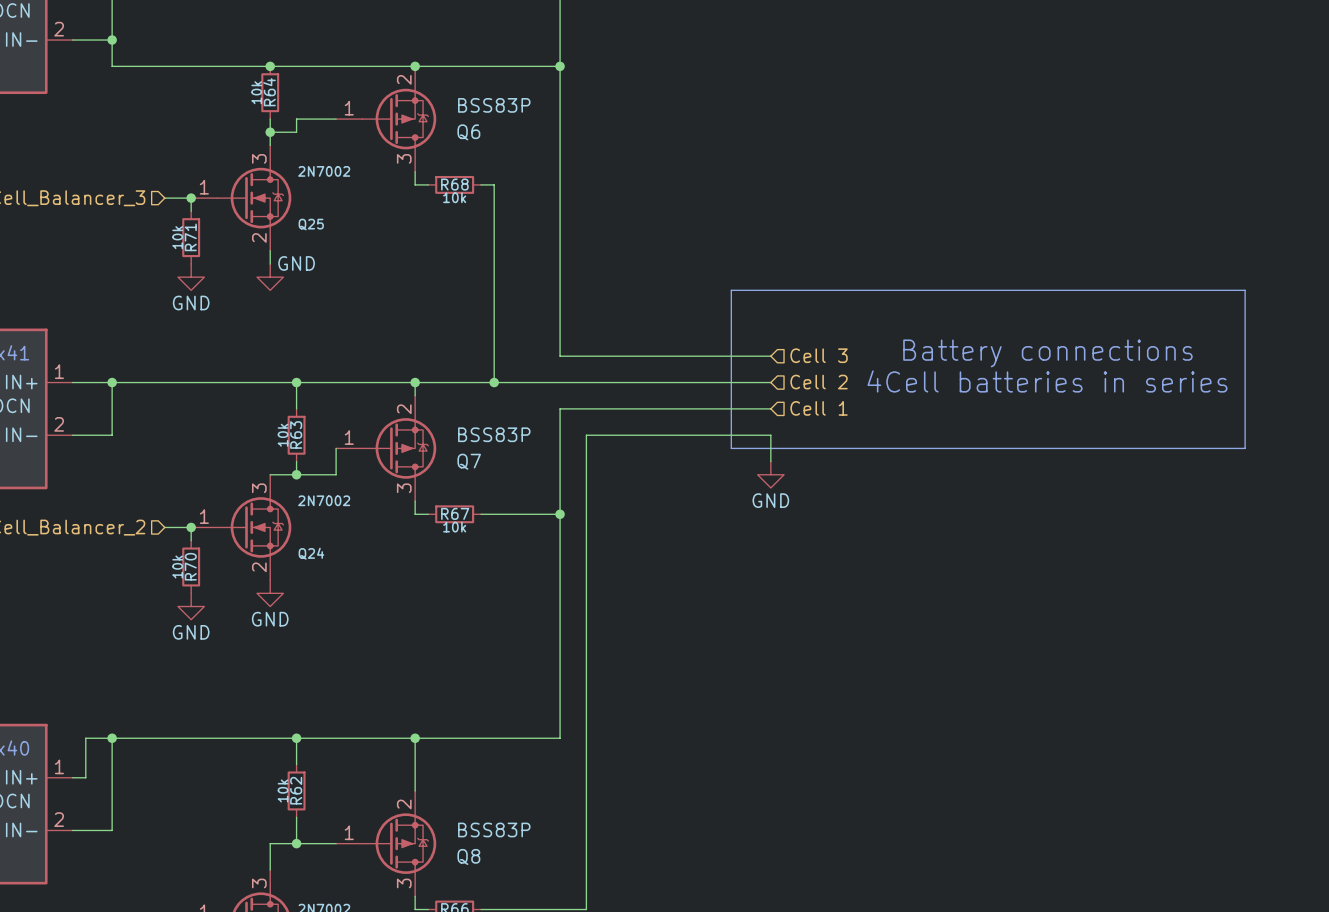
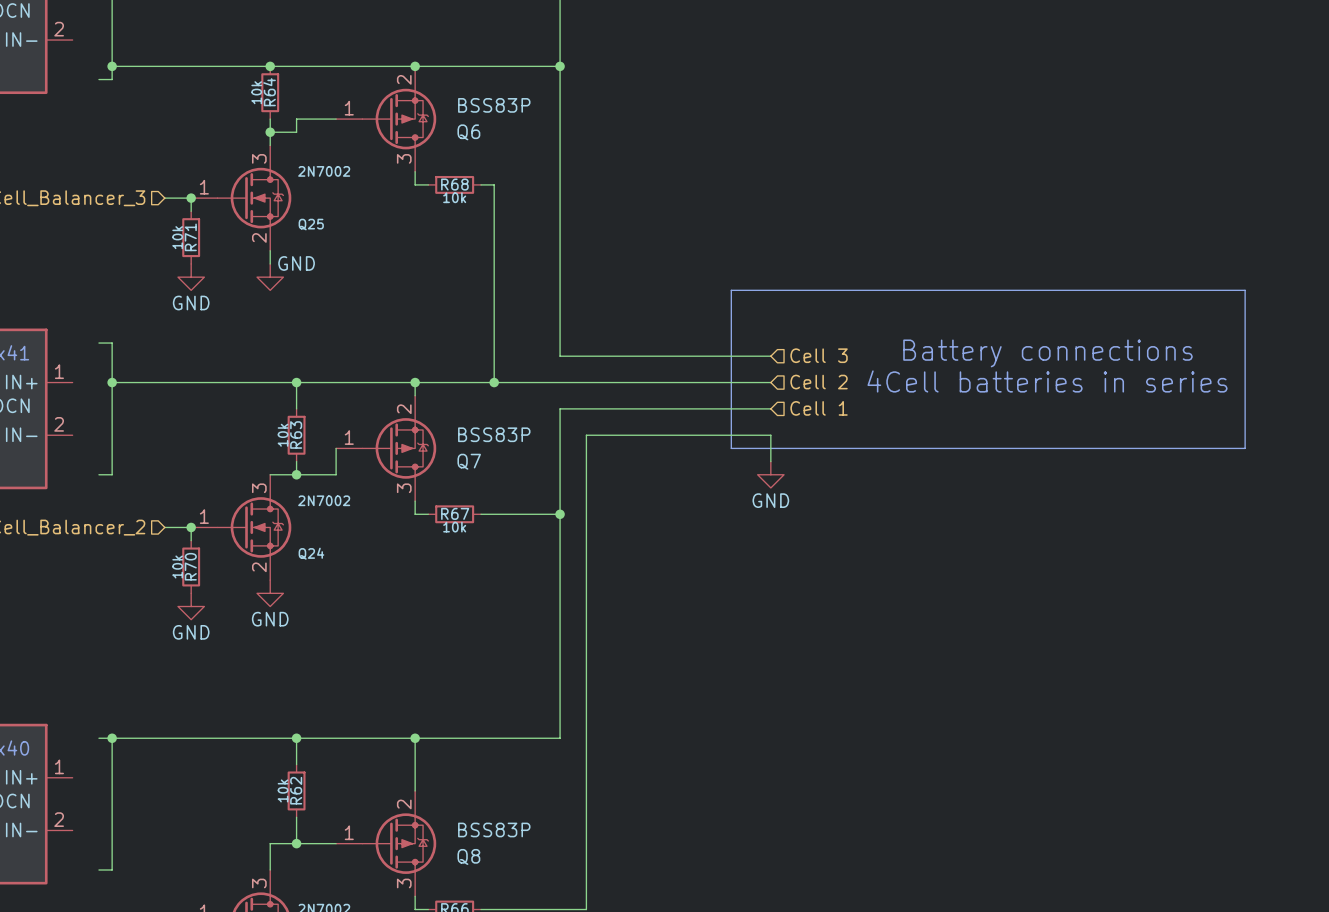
wire: (72, 40) (112, 40) -> none
junction position: (112, 40) -> (112, 66)
wire: none -> (112, 66) (112, 79) (98, 79)
wire: (72, 382) (112, 382) -> (98, 343) (112, 343) (112, 382)
wire: (72, 435) (112, 435) -> (98, 474) (112, 474) (112, 435)
wire: (98, 738) (85, 738) (85, 777) (72, 777) -> none
wire: (72, 830) (112, 830) -> (98, 869) (112, 869) (112, 830)

